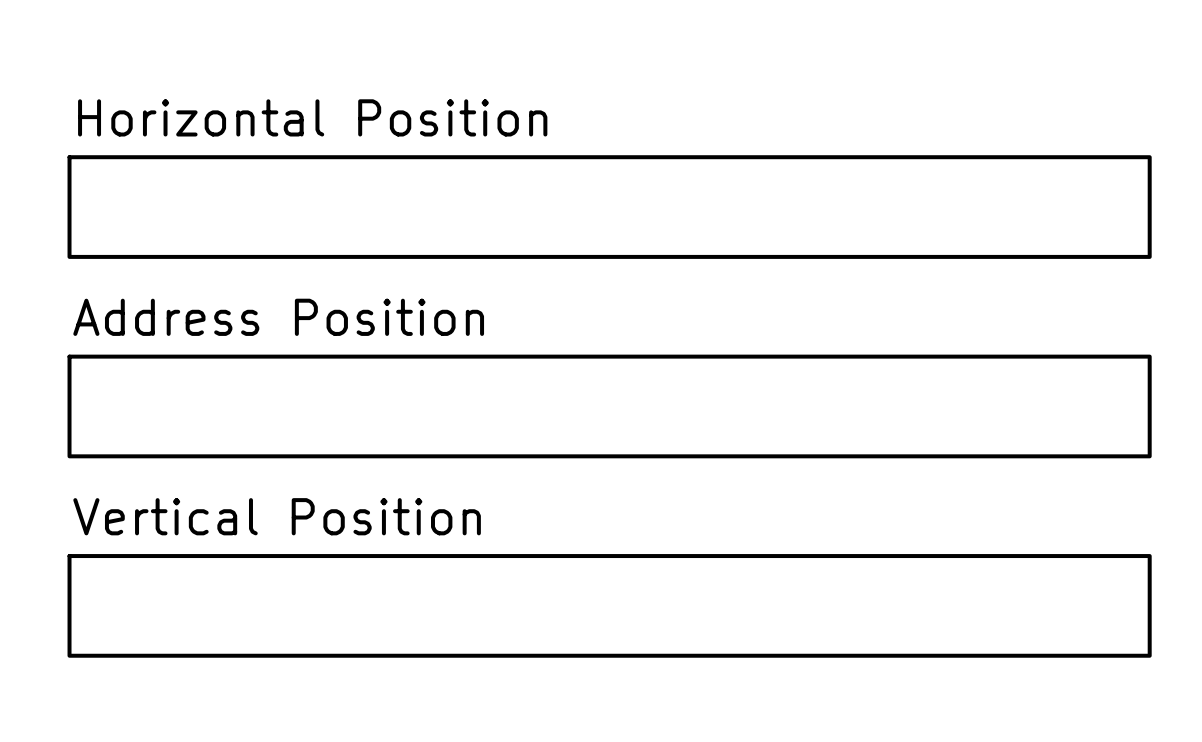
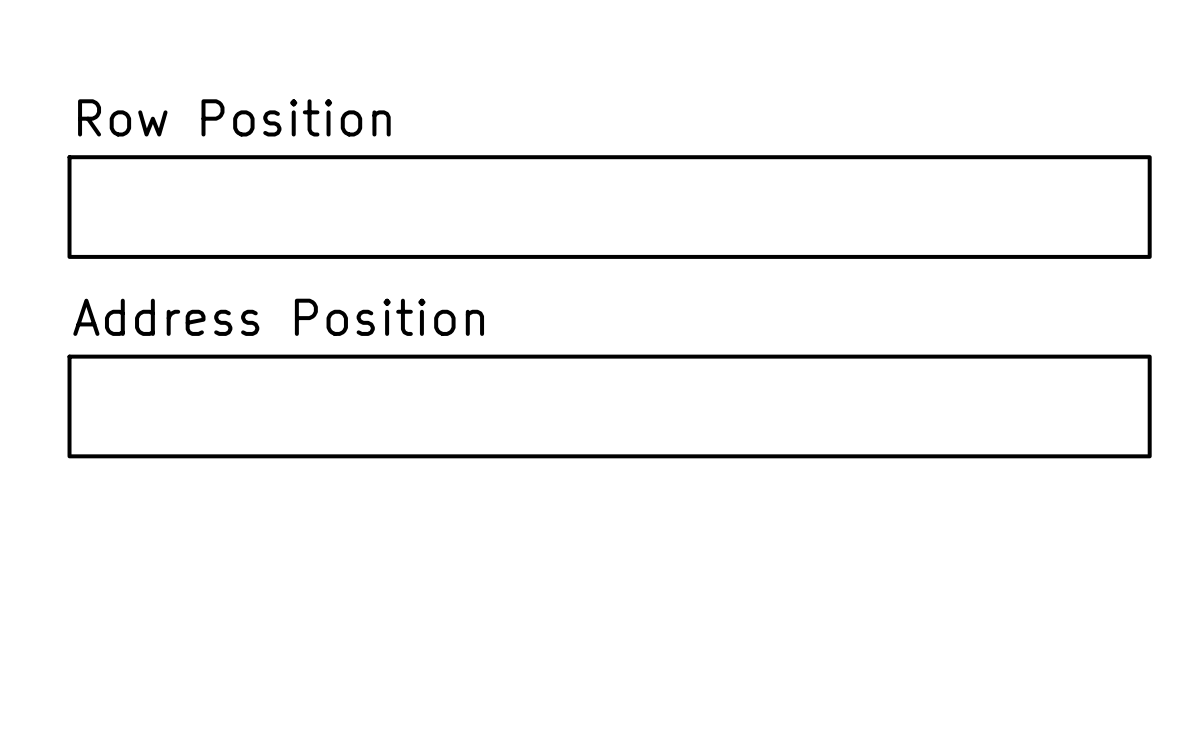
sheet Horizontal Position name: Horizontal Position (312, 117) -> Row Position (234, 117)
sheet Vertical Position: (609, 605) -> none

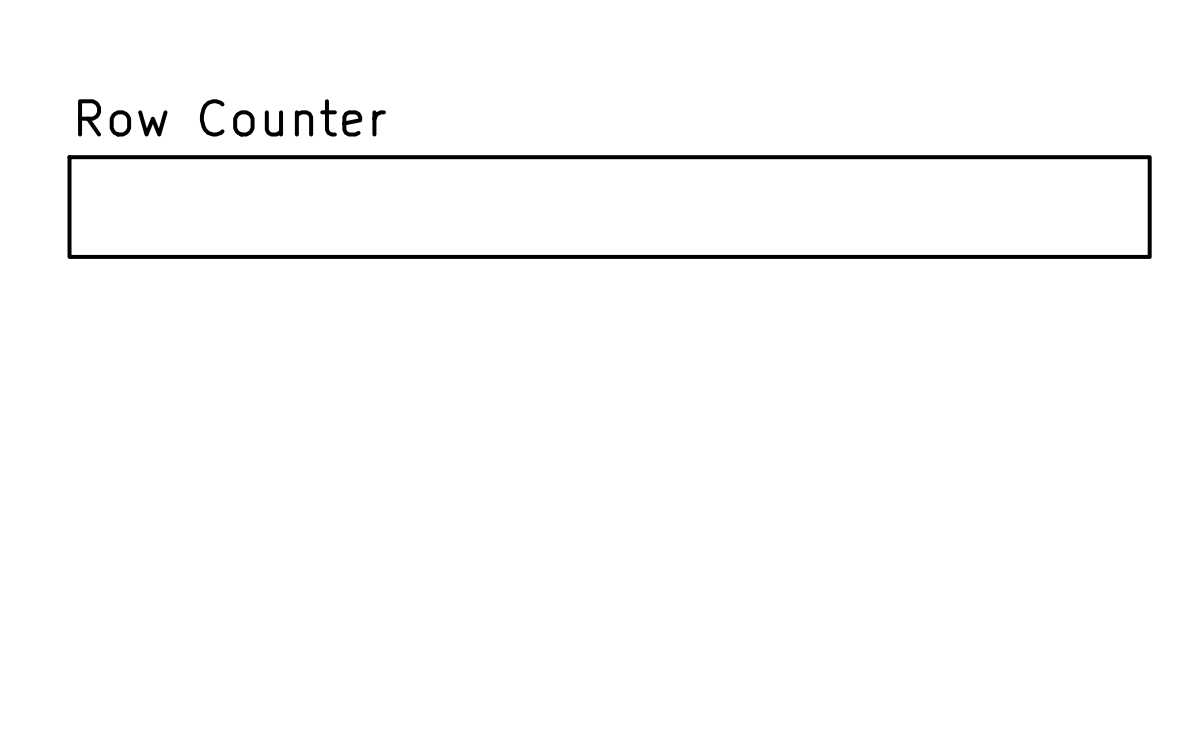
sheet Row Position name: Row Position (234, 117) -> Row Counter (231, 117)
sheet Address Position: (609, 406) -> none

